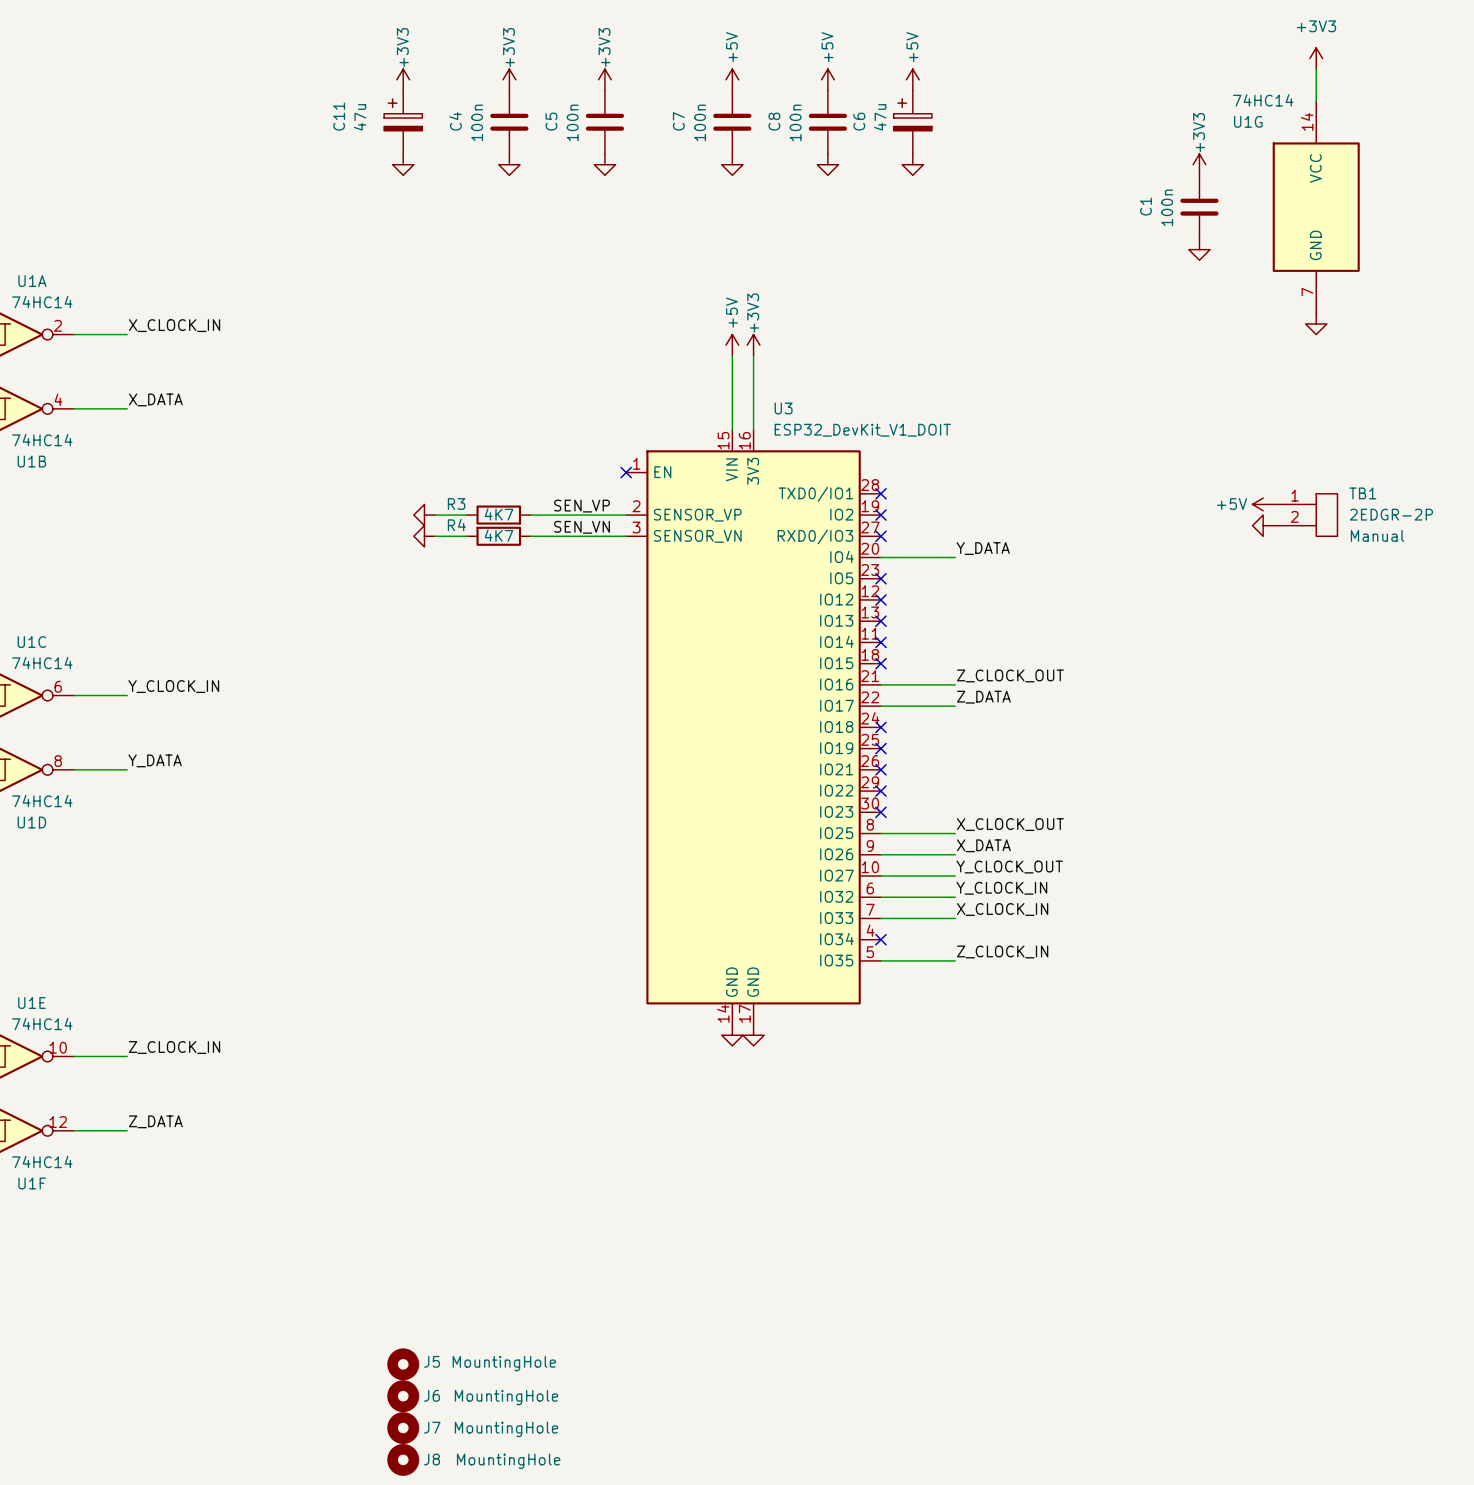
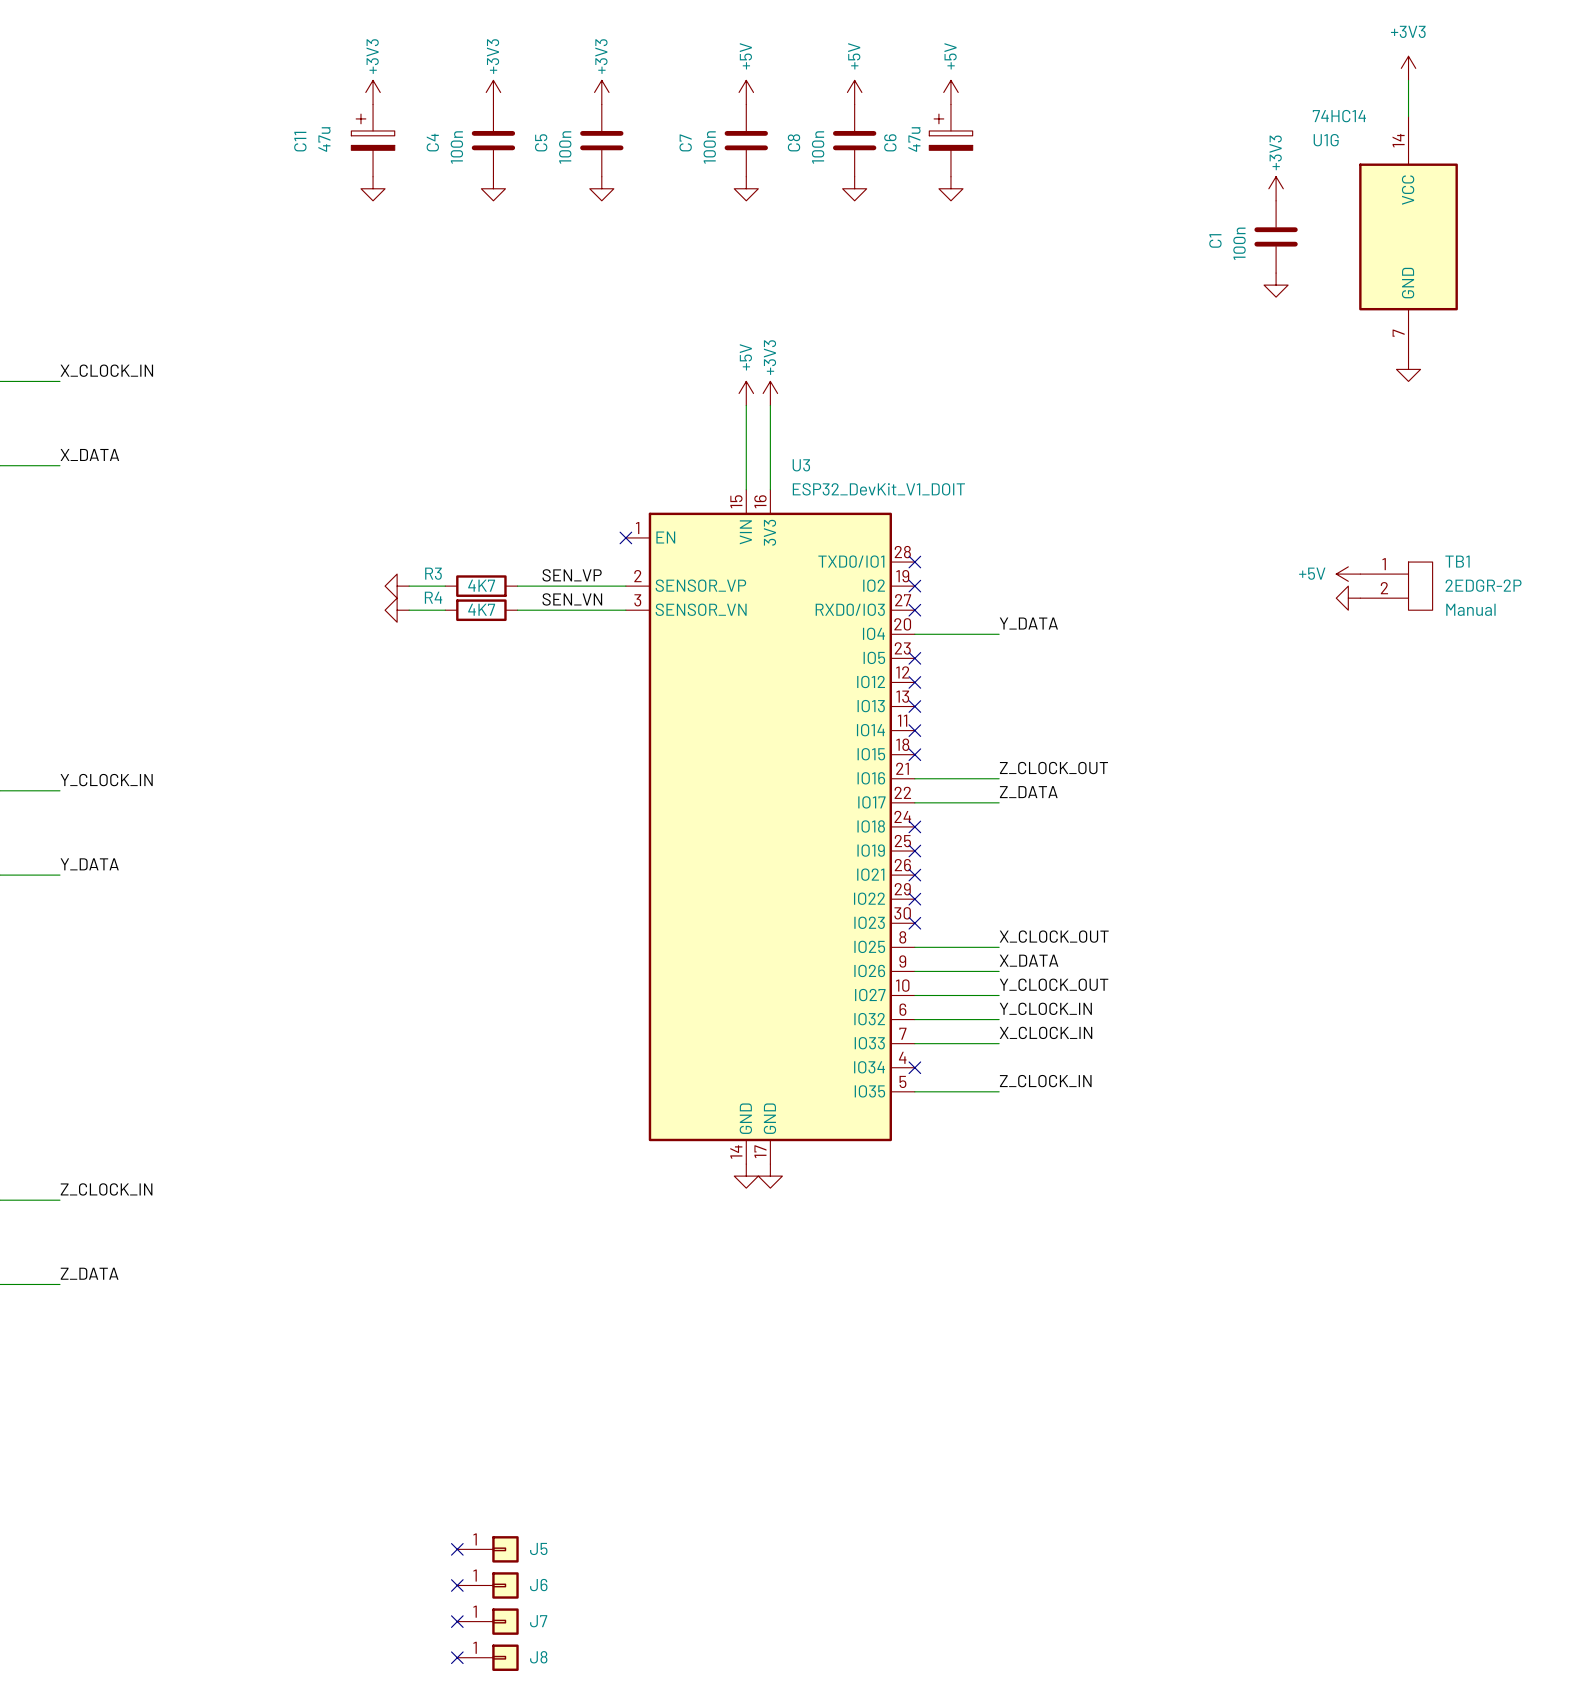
J5 symbol: [387, 1348, 420, 1381] -> [457, 1536, 519, 1563]
J5 name position: J5 (432, 1361) -> J5 (538, 1548)
J5 value: MountingHole (504, 1363) -> none
no-connect mark: none -> (457, 1549)
J6 symbol: [387, 1380, 420, 1413] -> [457, 1572, 519, 1599]
J6 name position: J6 (432, 1395) -> J6 (538, 1585)
no-connect mark: none -> (457, 1585)
J6 value: MountingHole (506, 1397) -> none
J7 symbol: [387, 1412, 420, 1444] -> [457, 1608, 519, 1635]
J7 name position: J7 (432, 1427) -> J7 (538, 1621)
no-connect mark: none -> (457, 1621)
J7 value: MountingHole (506, 1429) -> none
J8 symbol: [387, 1443, 420, 1476] -> [457, 1644, 519, 1671]
J8 name position: J8 (432, 1459) -> J8 (538, 1657)
no-connect mark: none -> (457, 1657)
J8 value: MountingHole (508, 1461) -> none

